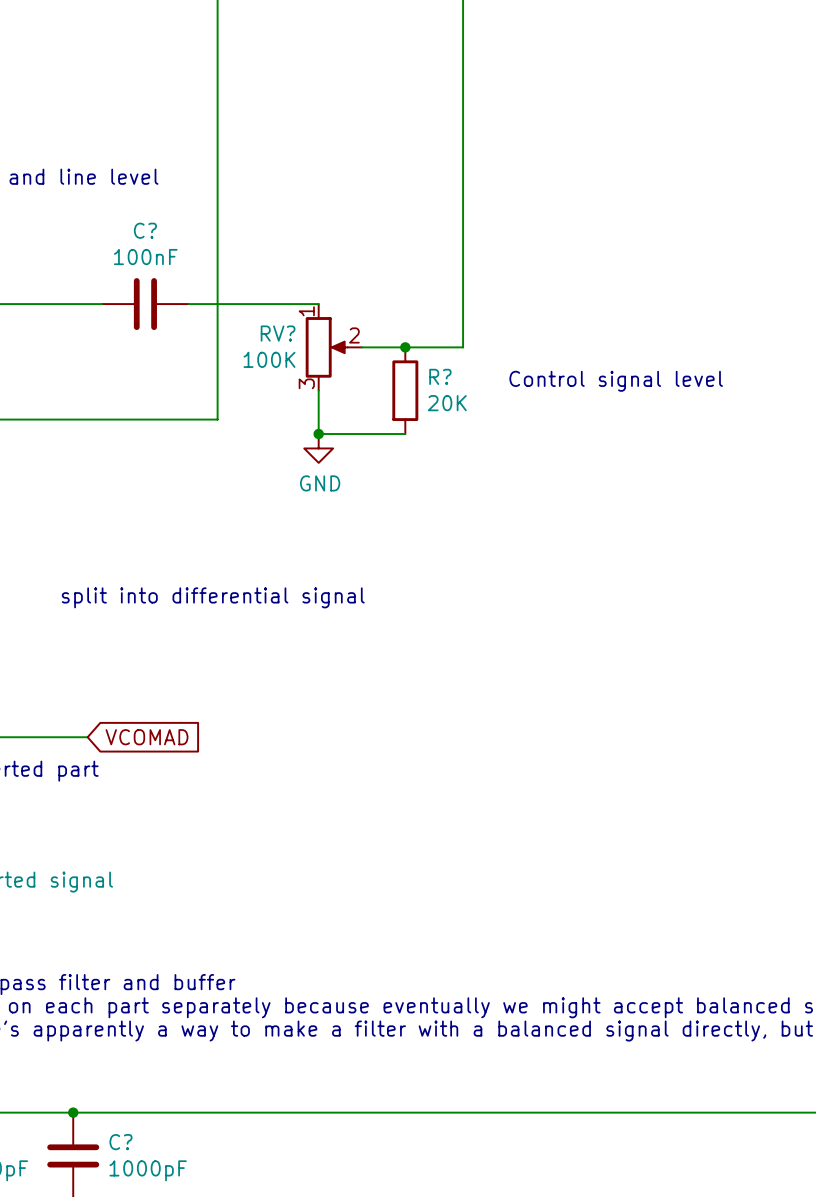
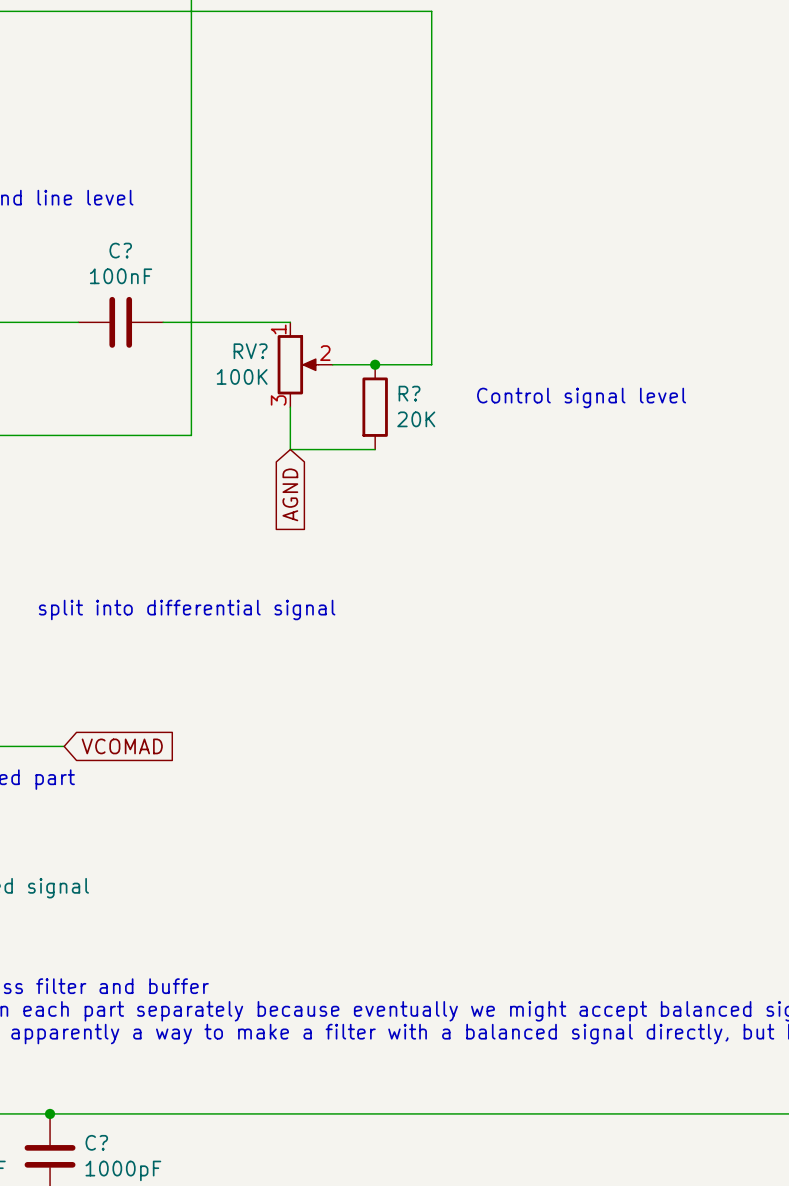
junction: (318, 434) -> none
power symbol: GND (318, 448) -> none
global label: none -> AGND (290, 494)

